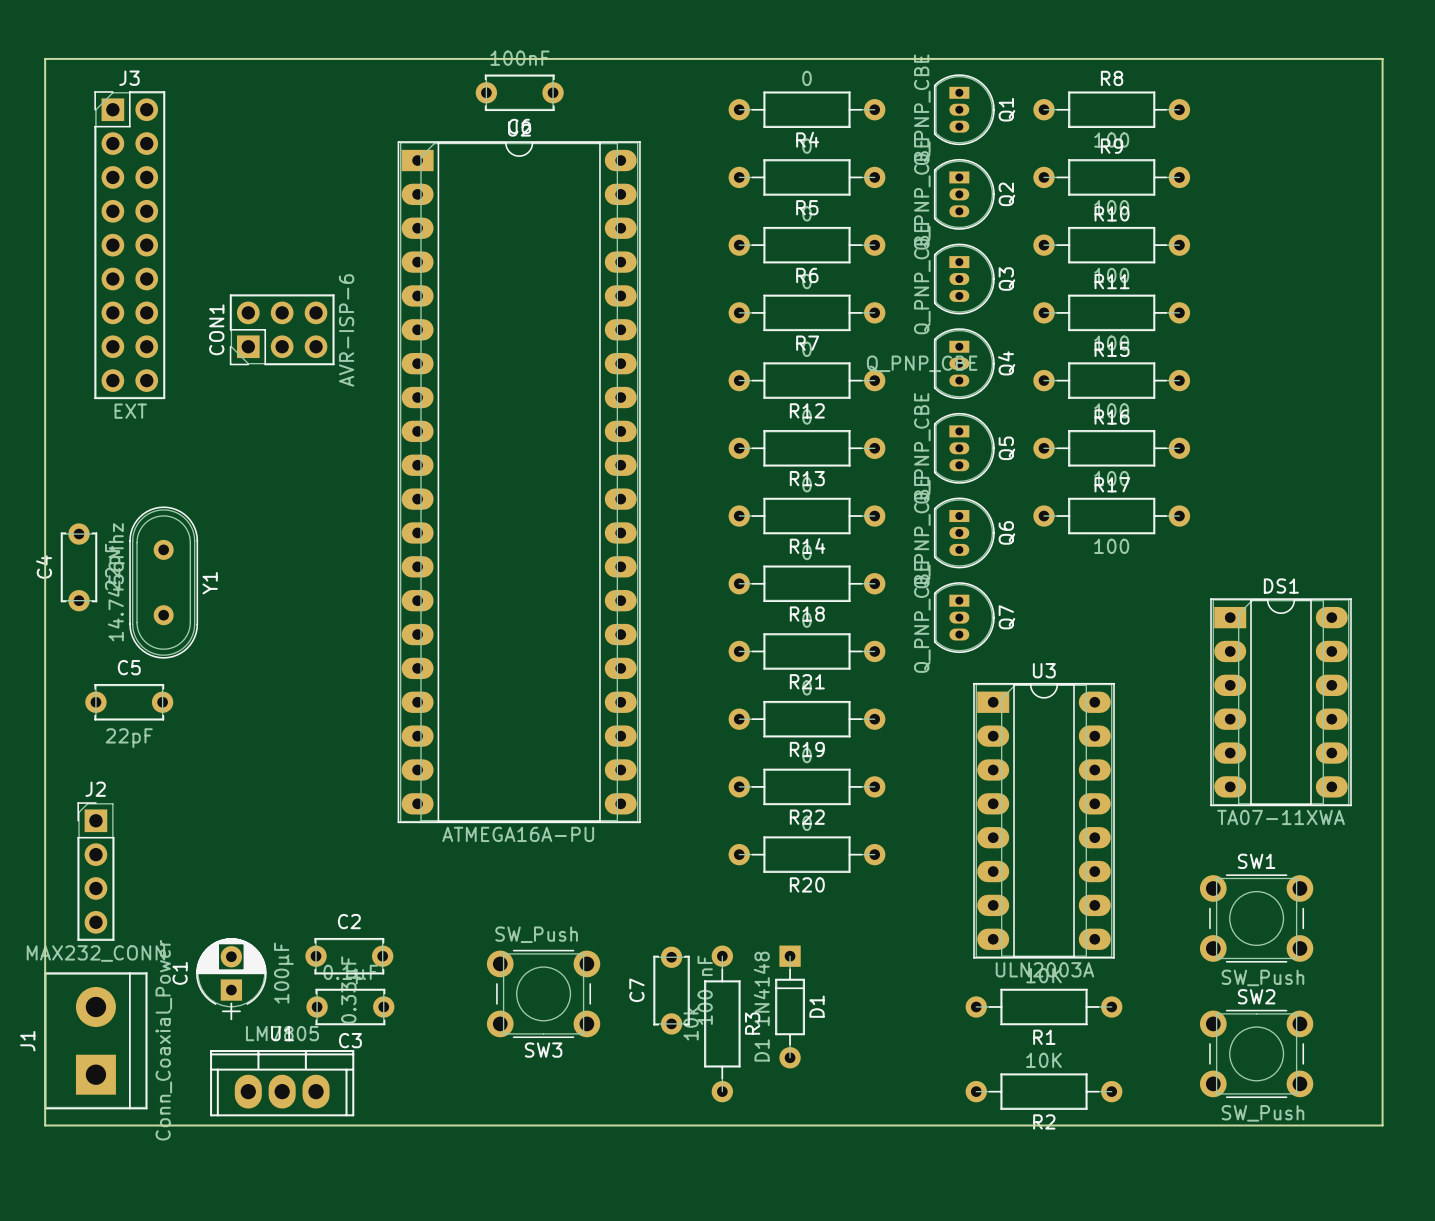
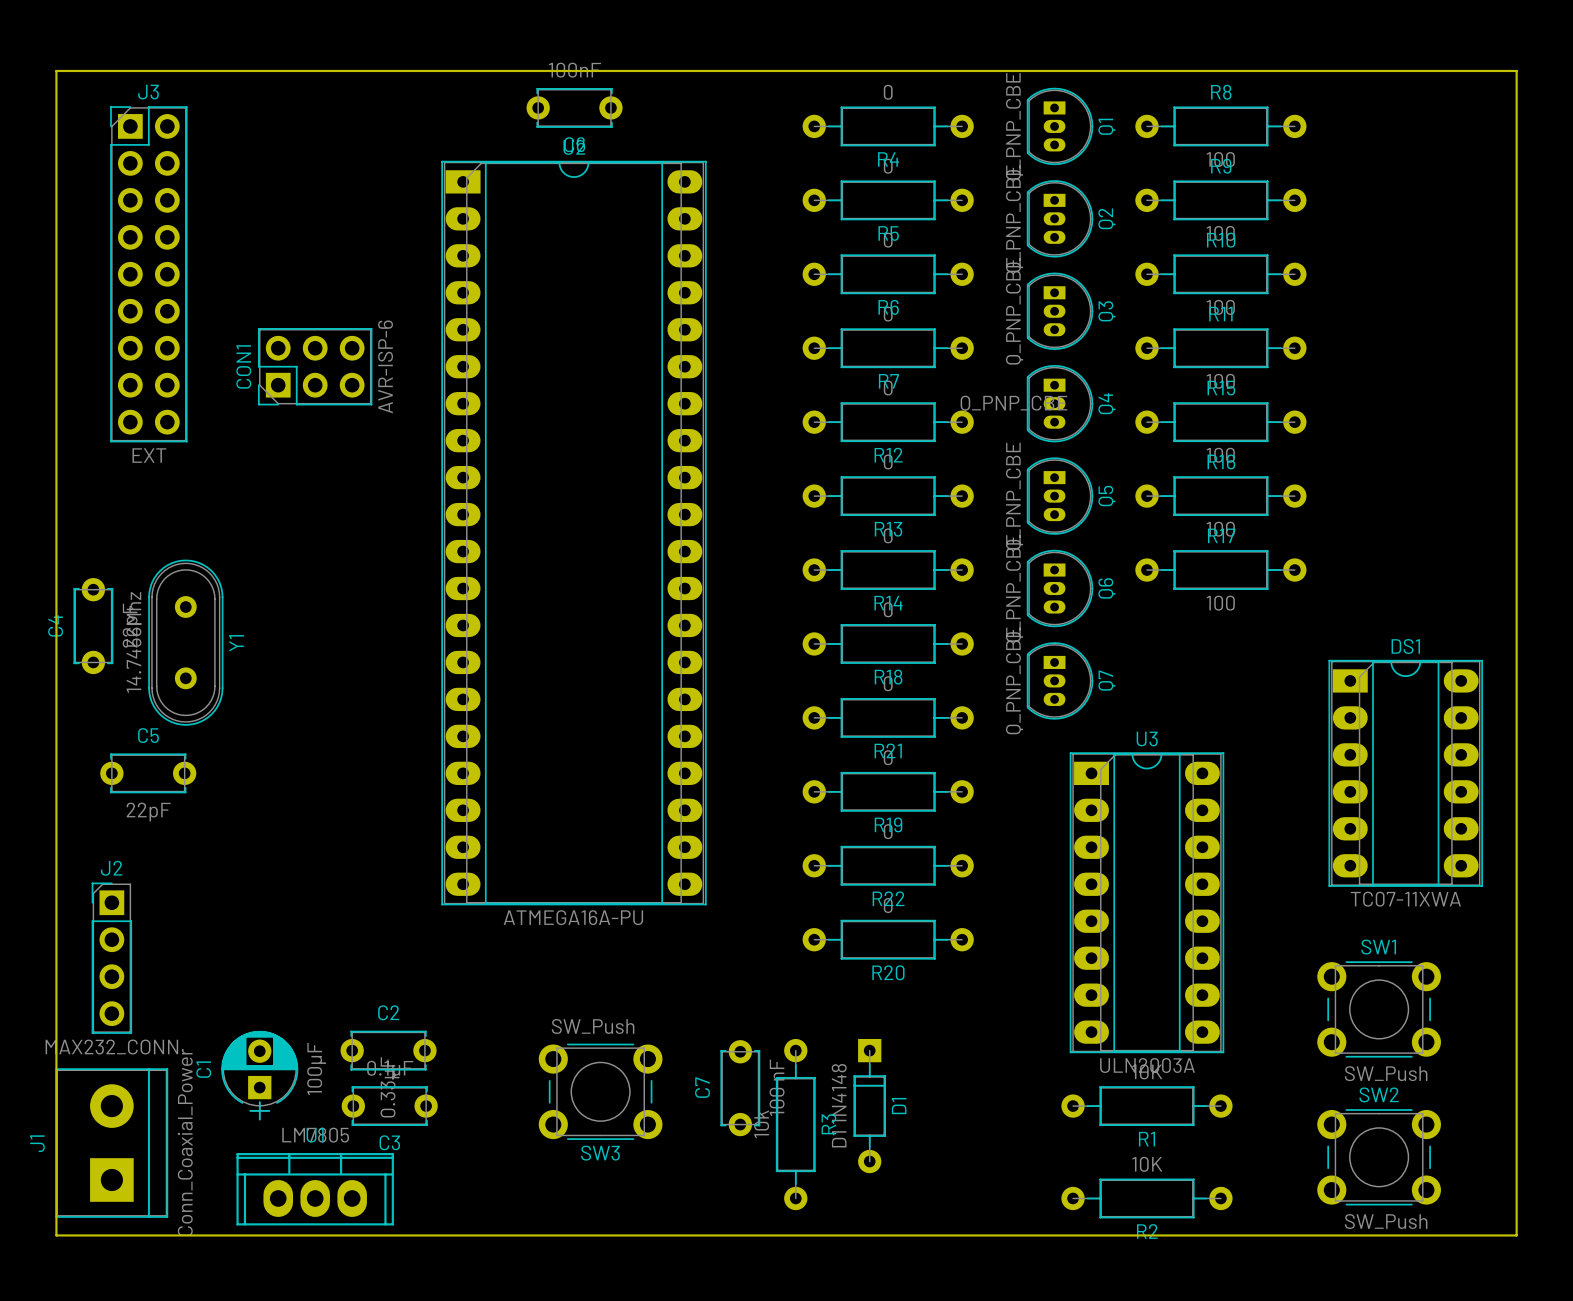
DS1 value: TA07-11XWA (1281, 817) -> TC07-11XWA (1405, 899)

